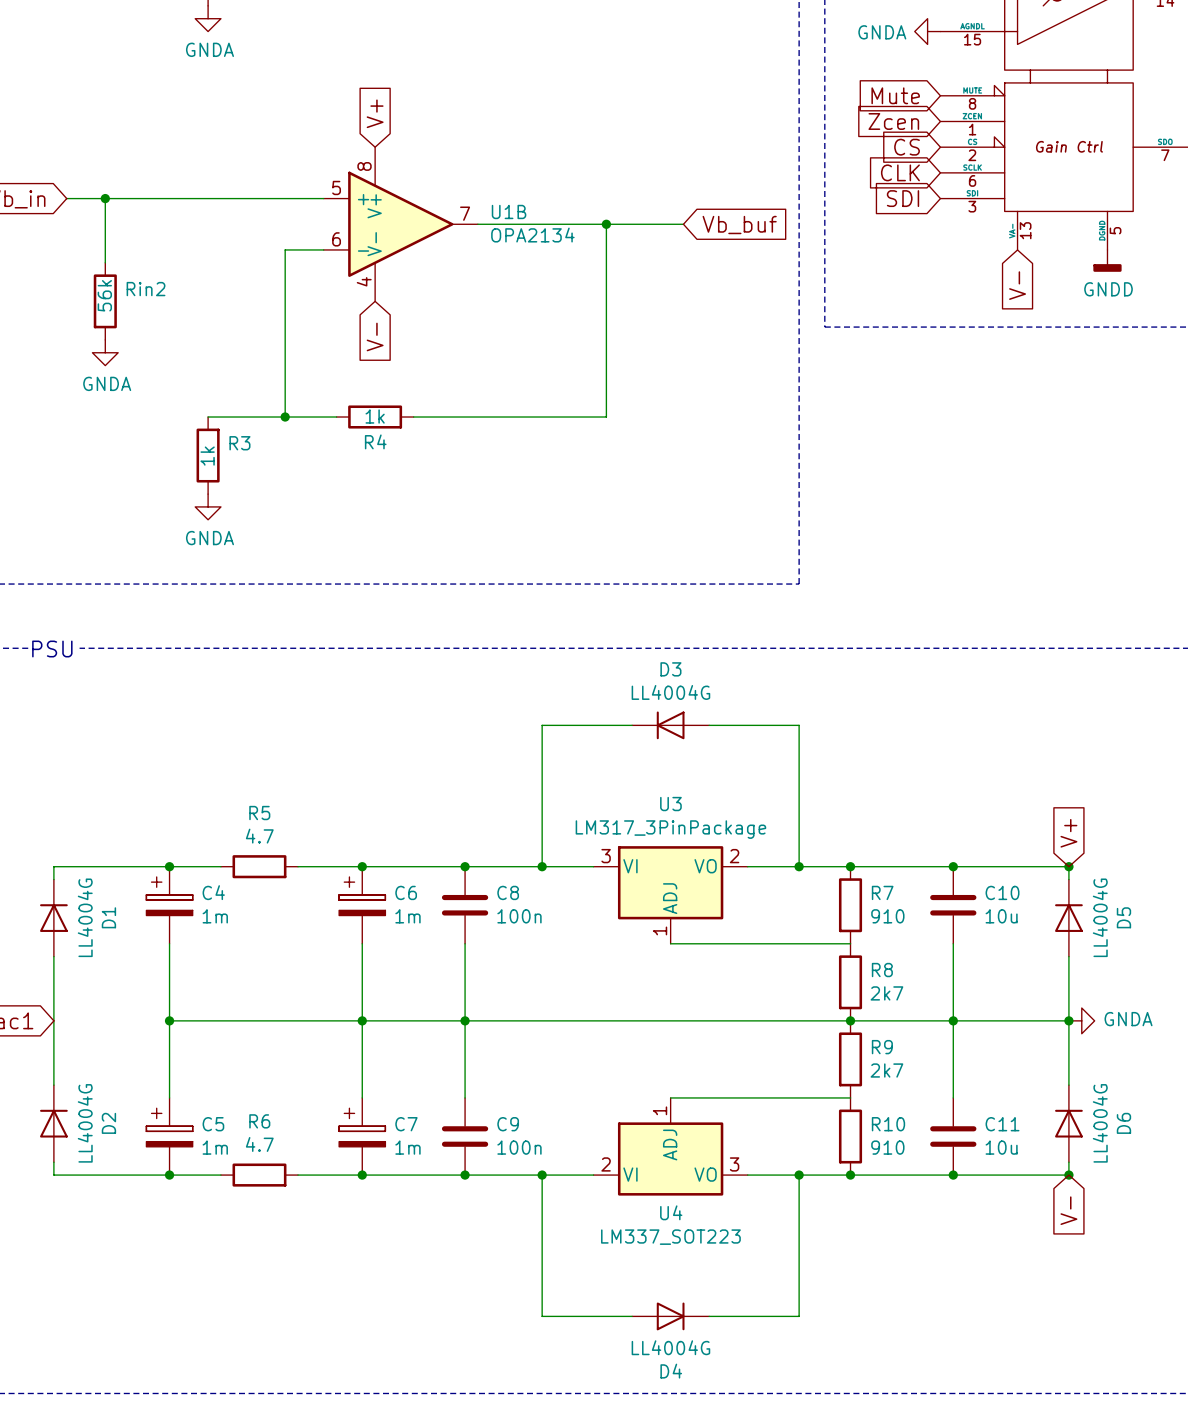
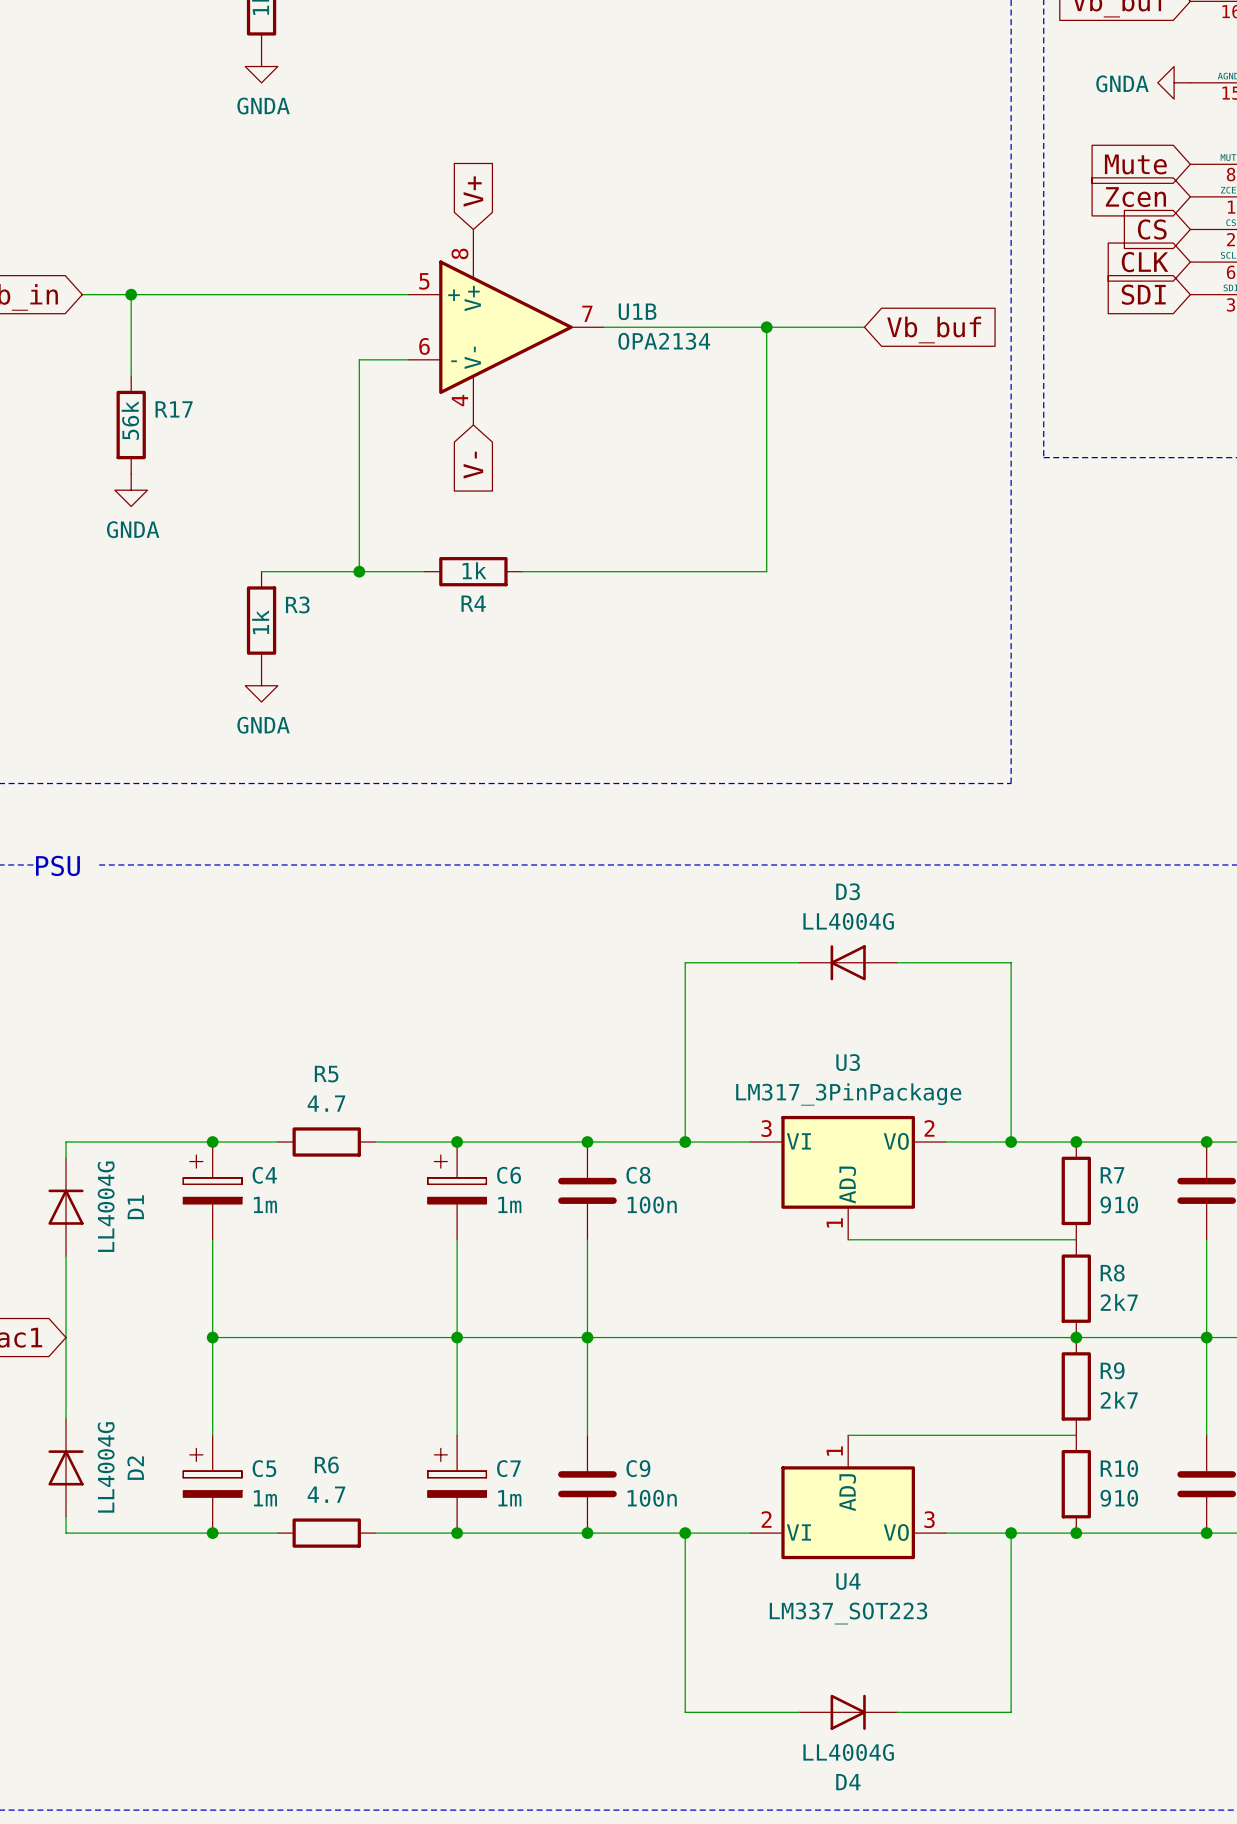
Rin2 name: Rin2 (146, 289) -> R17 (174, 409)

